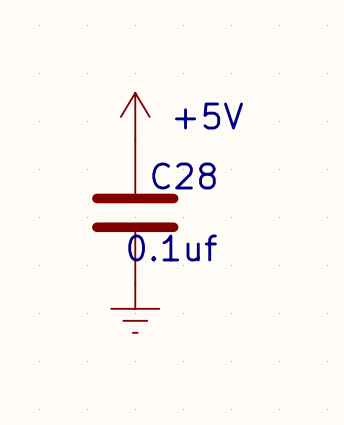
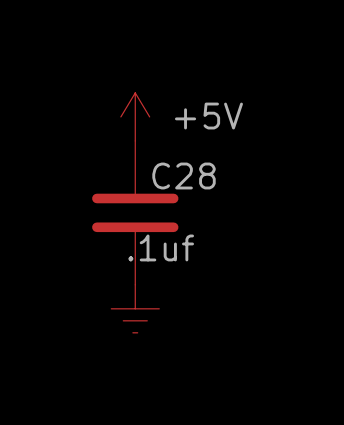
C28 value: 0.1uf (172, 247) -> .1uf (161, 247)

